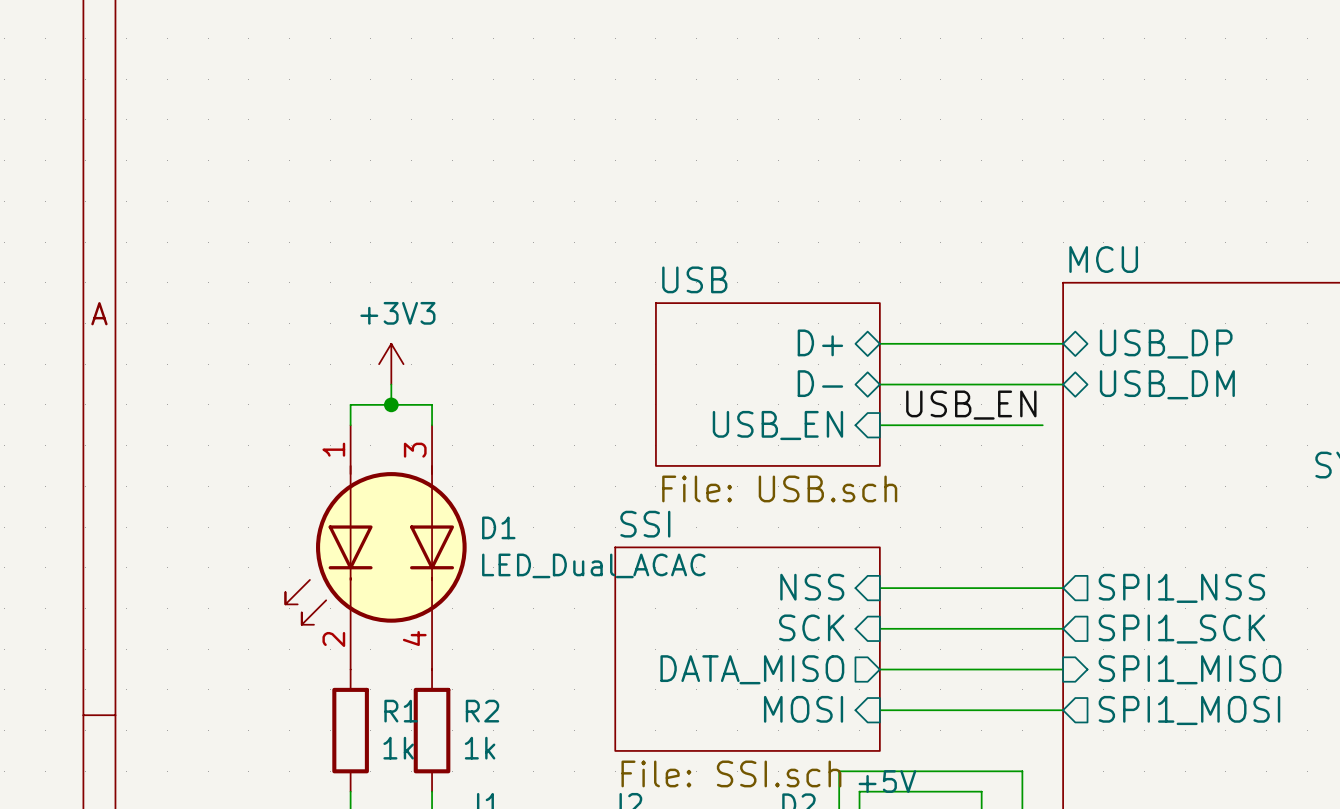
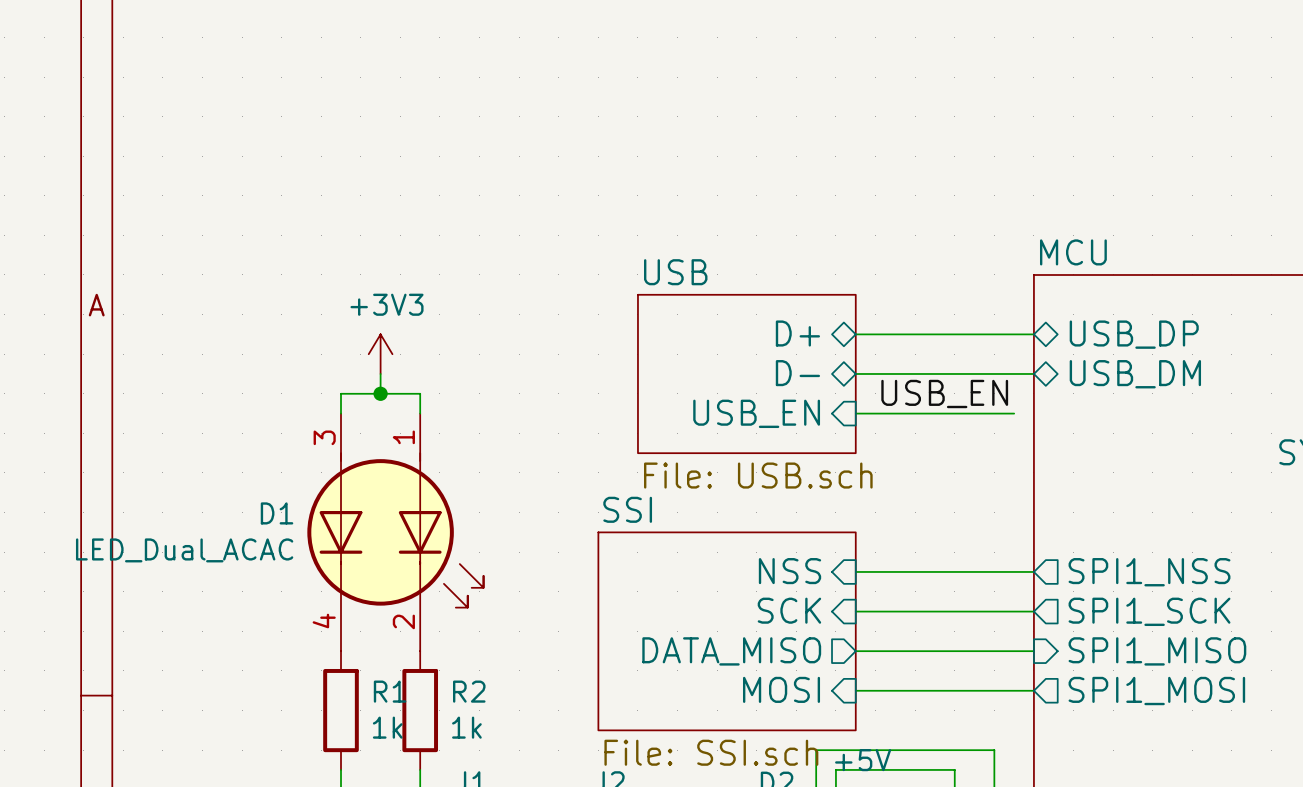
D1 flip: as is (376, 545) -> left-right (395, 530)

